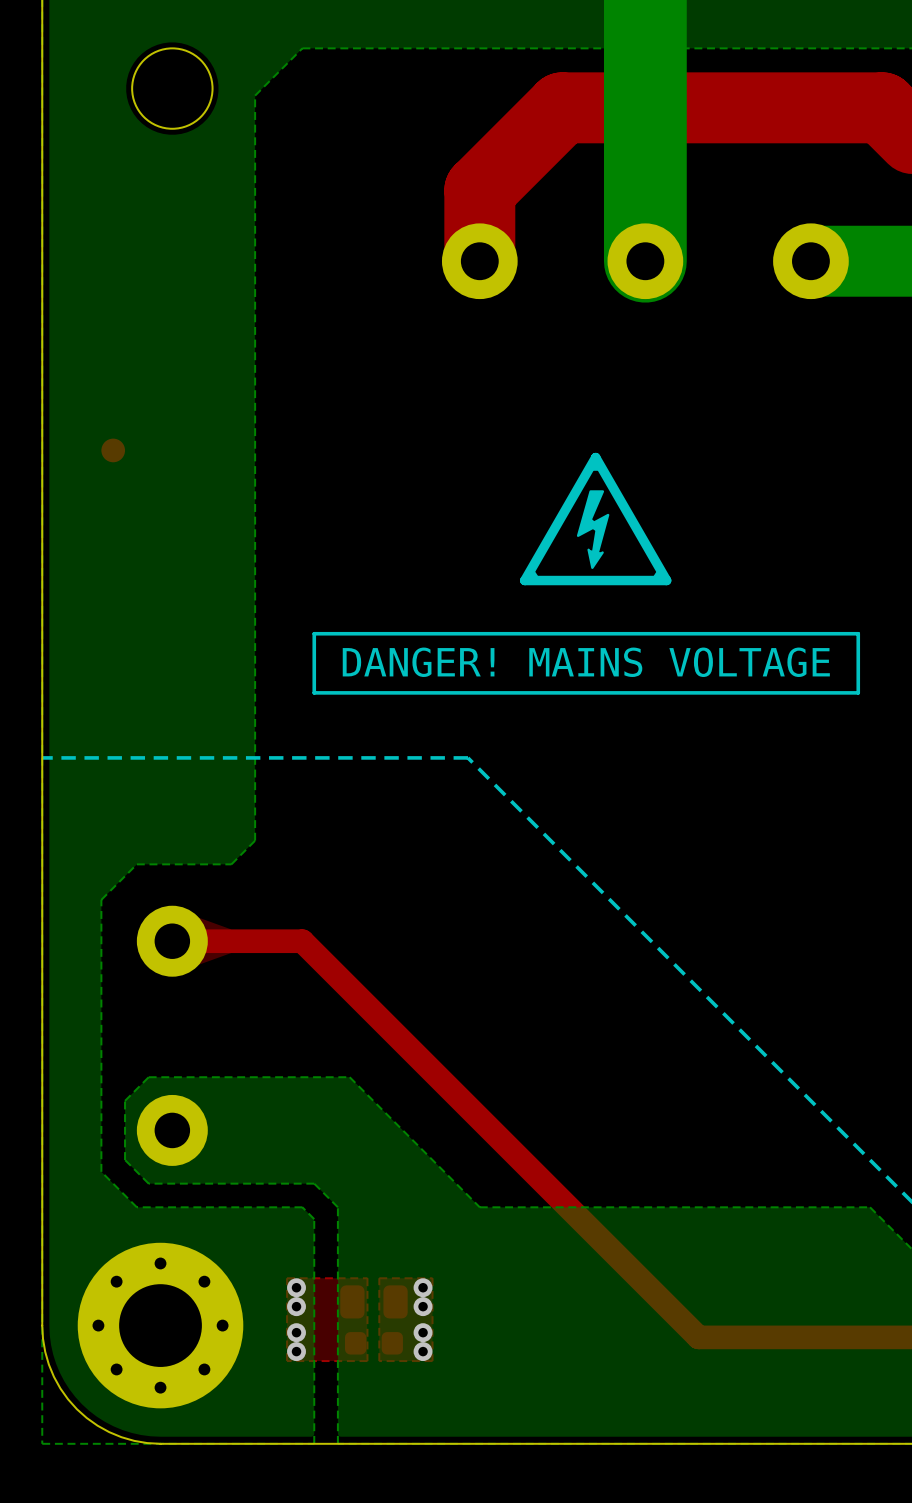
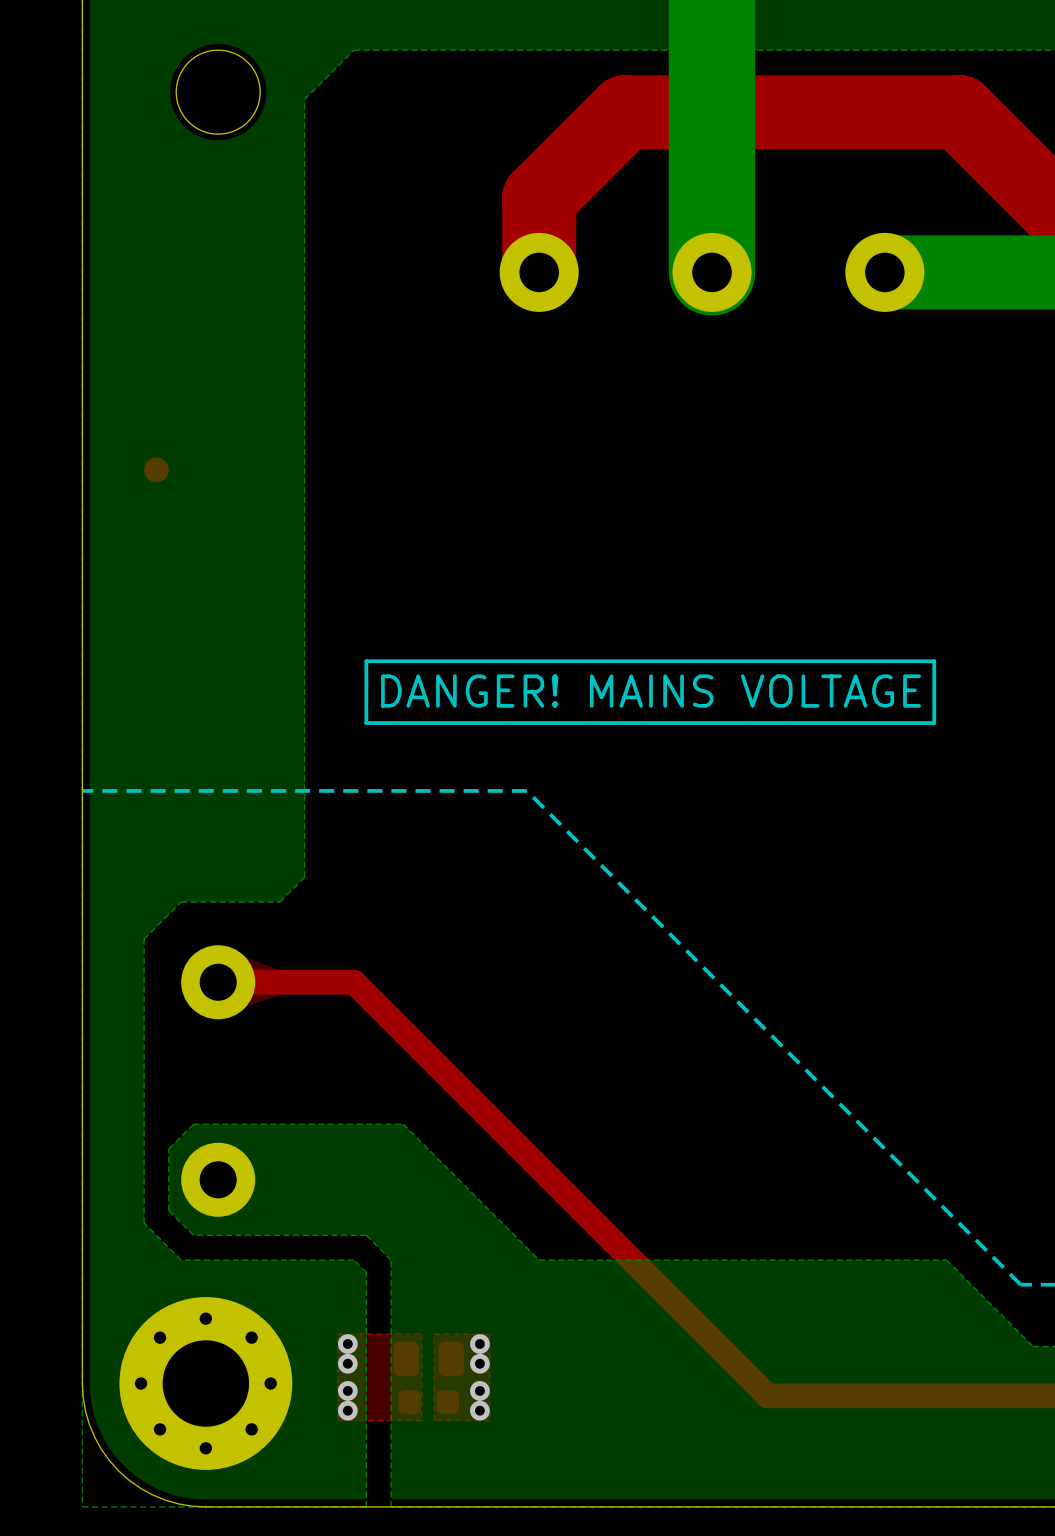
drawing: [520, 452, 672, 586] -> none

